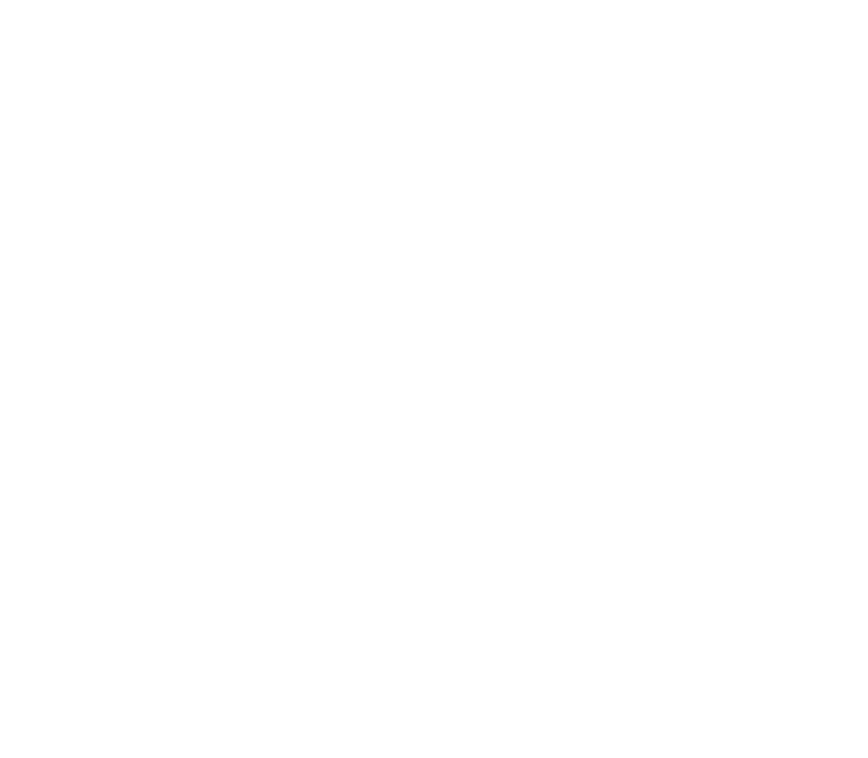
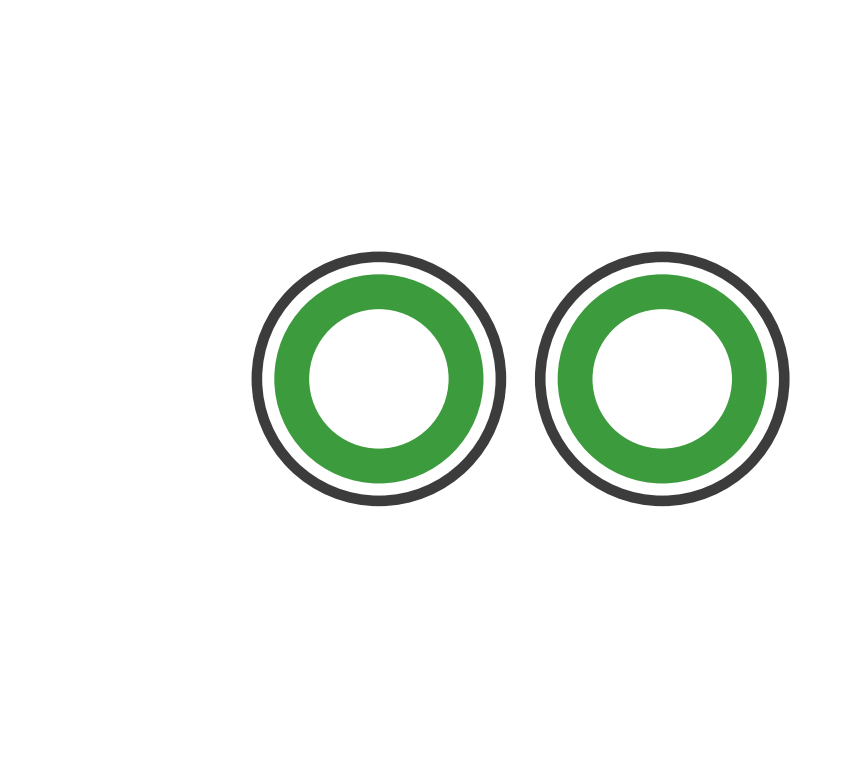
part: none -> (378, 378)
part: none -> (662, 378)

